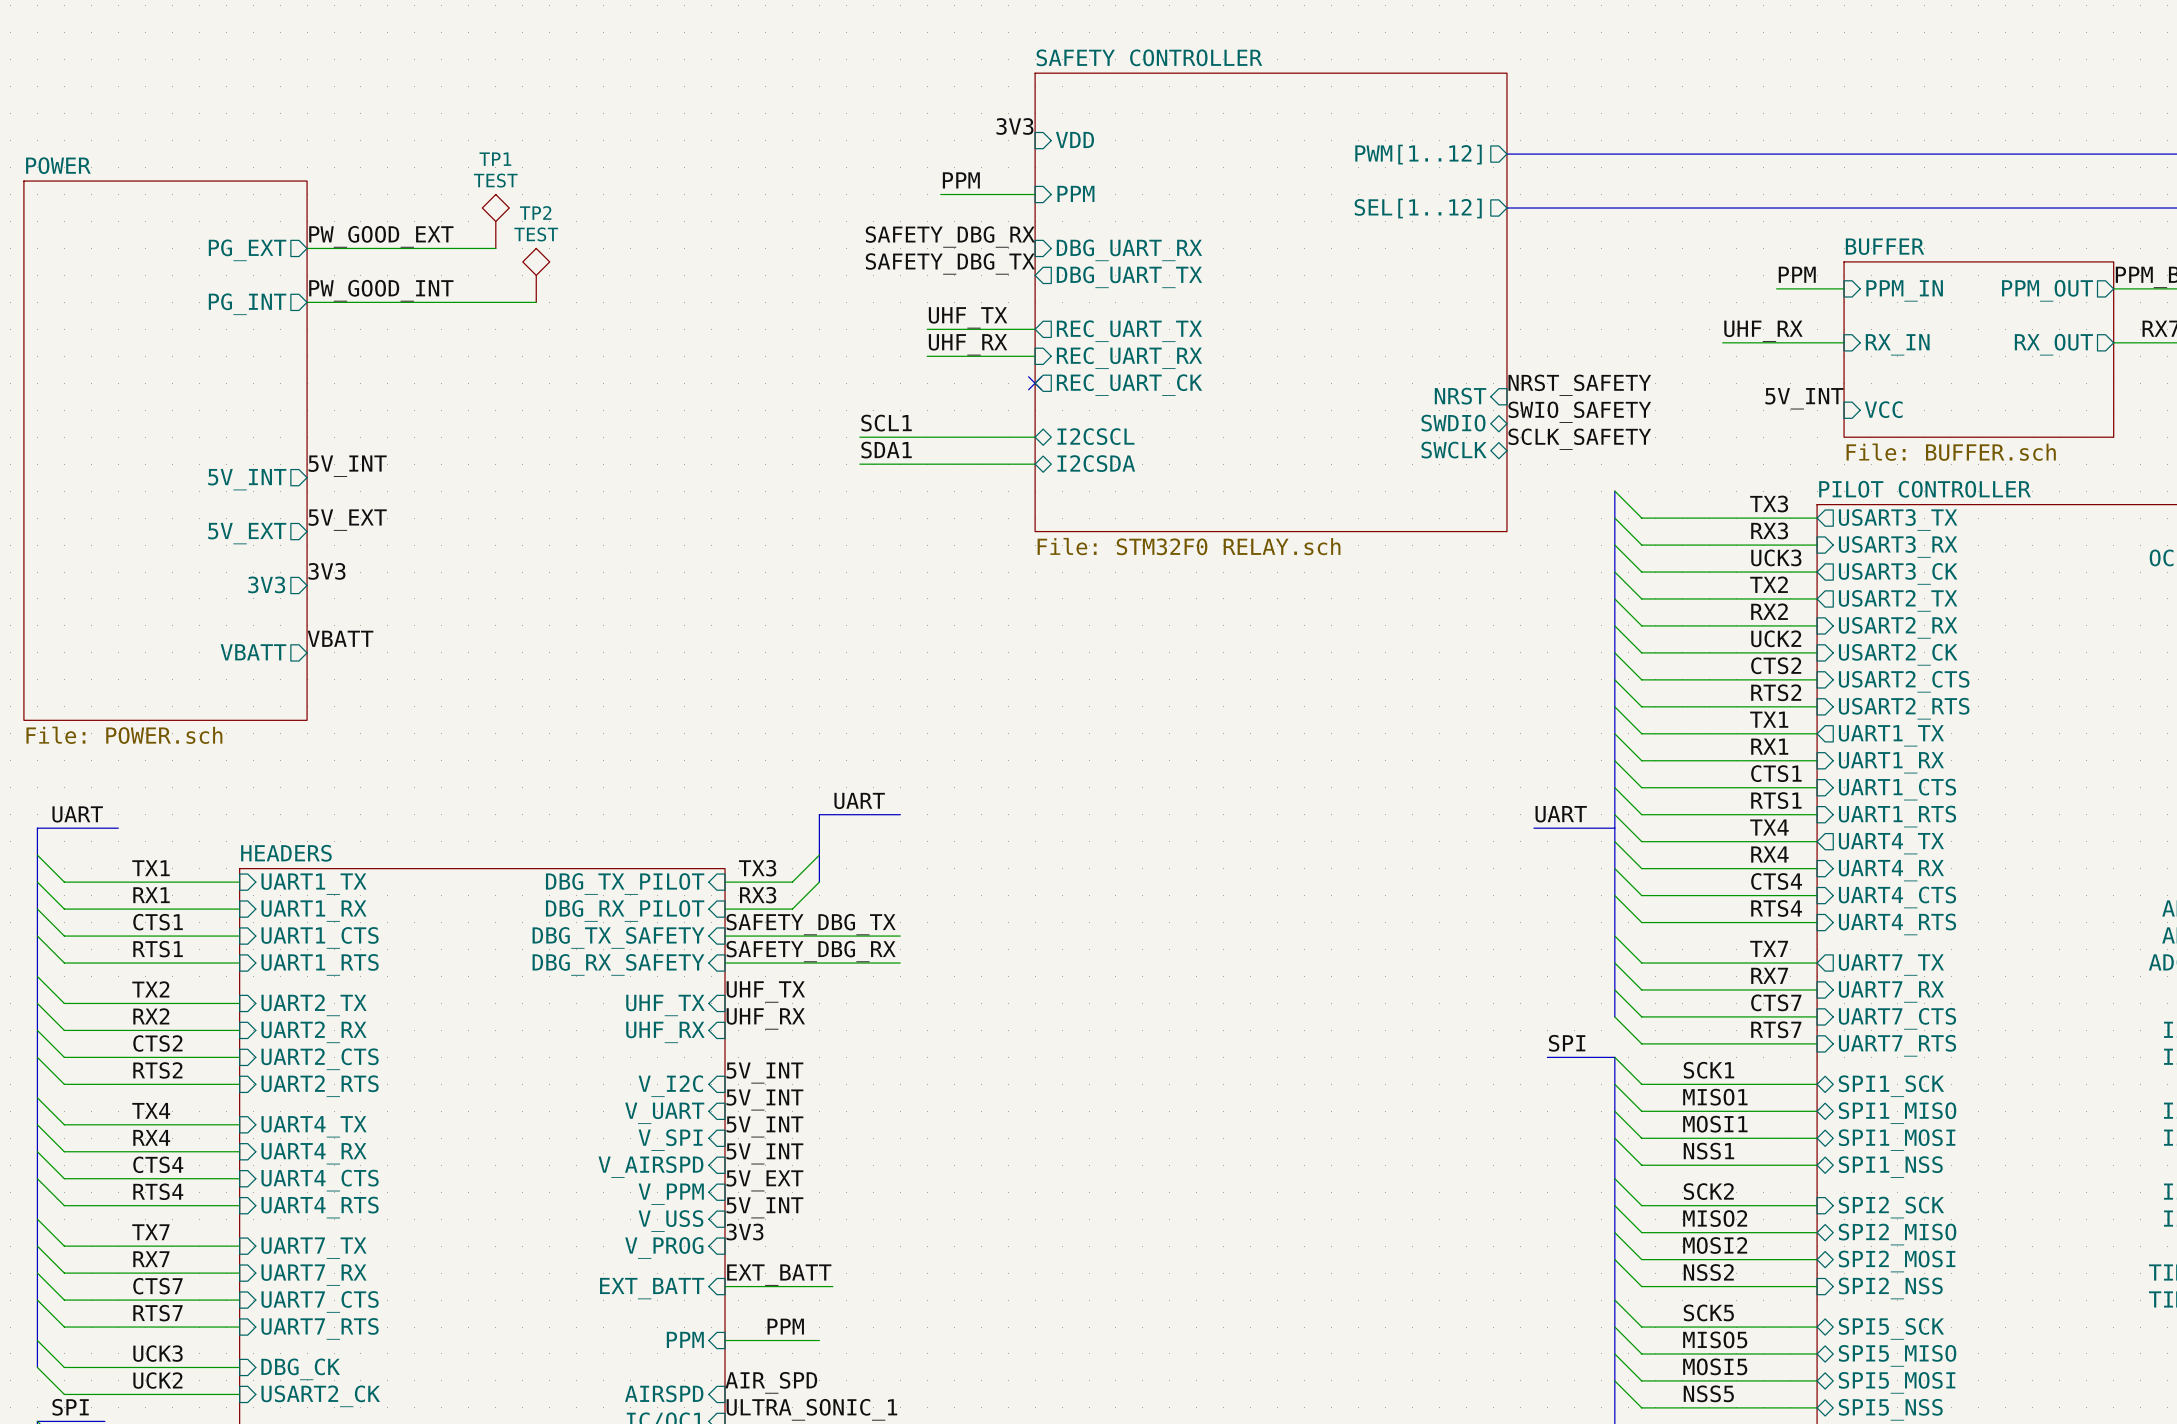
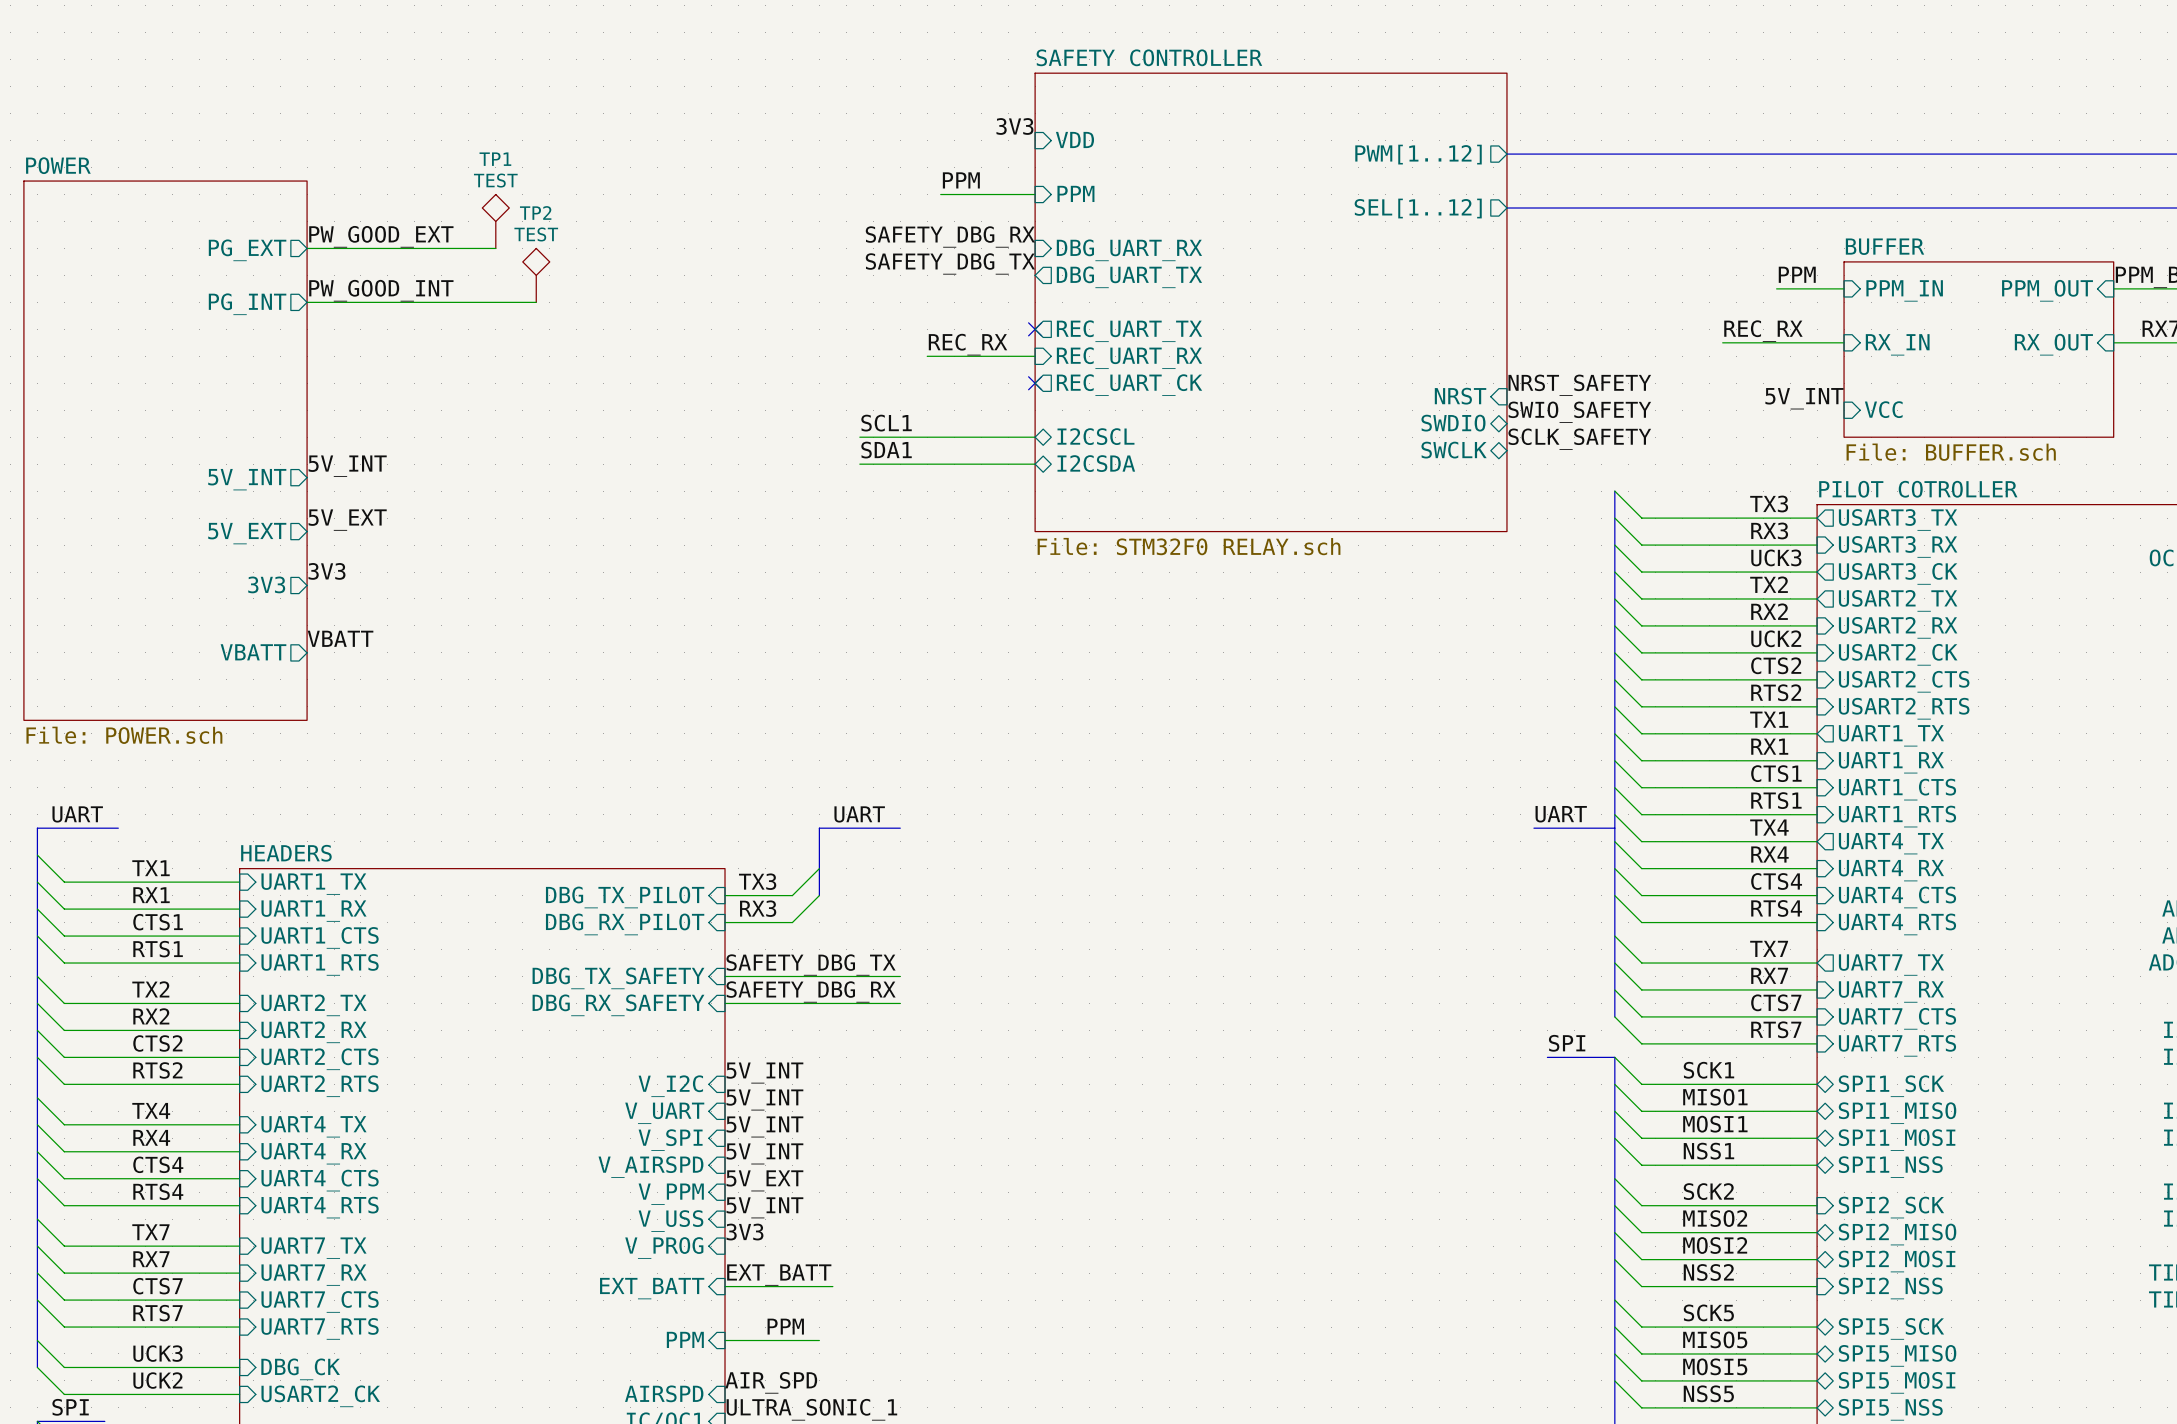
sheet pin shape: output (2047, 290) -> input (2047, 290)
label: UHF_TX (968, 317) -> none
wire: (927, 329) (1035, 329) -> none
no-connect mark: none -> (1035, 329)
label: UHF_RX (1763, 331) -> REC_RX (1763, 331)
label: UHF_RX (968, 344) -> REC_RX (967, 344)
sheet pin shape: output (2053, 344) -> input (2053, 344)
sheet PILOT CONTROLLER name: PILOT CONTROLLER (1925, 489) -> PILOT COTROLLER (1918, 489)
label position: UART (859, 800) -> UART (859, 814)
bus: (900, 814) (819, 814) (819, 828) -> (900, 828) (819, 828)
wire: (819, 855) (792, 882) (725, 882) -> (819, 868) (792, 895) (725, 895)
label position: TX3 (757, 868) -> TX3 (757, 881)
wire: (819, 882) (792, 909) (725, 909) -> (819, 895) (792, 922) (725, 922)
bus: none -> (819, 882) (819, 895)
sheet pin position: DBG_TX_PILOT (625, 883) -> DBG_TX_PILOT (625, 897)
label position: RX3 (758, 895) -> RX3 (758, 908)
sheet pin position: DBG_RX_PILOT (625, 910) -> DBG_RX_PILOT (625, 924)
label position: SAFETY_DBG_TX (811, 924) -> SAFETY_DBG_TX (811, 965)
wire: (725, 936) (900, 936) -> (725, 1003) (900, 1003)
sheet pin position: DBG_TX_SAFETY (618, 937) -> DBG_TX_SAFETY (618, 978)
label: SAFETY_DBG_RX (811, 951) -> none
wire: (725, 963) (900, 963) -> (725, 976) (900, 976)
sheet pin: DBG_RX_SAFETY (618, 964) -> none
label: UHF_TX (765, 991) -> SAFETY_DBG_RX (811, 991)
sheet pin: UHF_TX (665, 1005) -> DBG_RX_SAFETY (618, 1005)
label: UHF_RX (765, 1018) -> none
sheet pin: UHF_RX (665, 1032) -> none

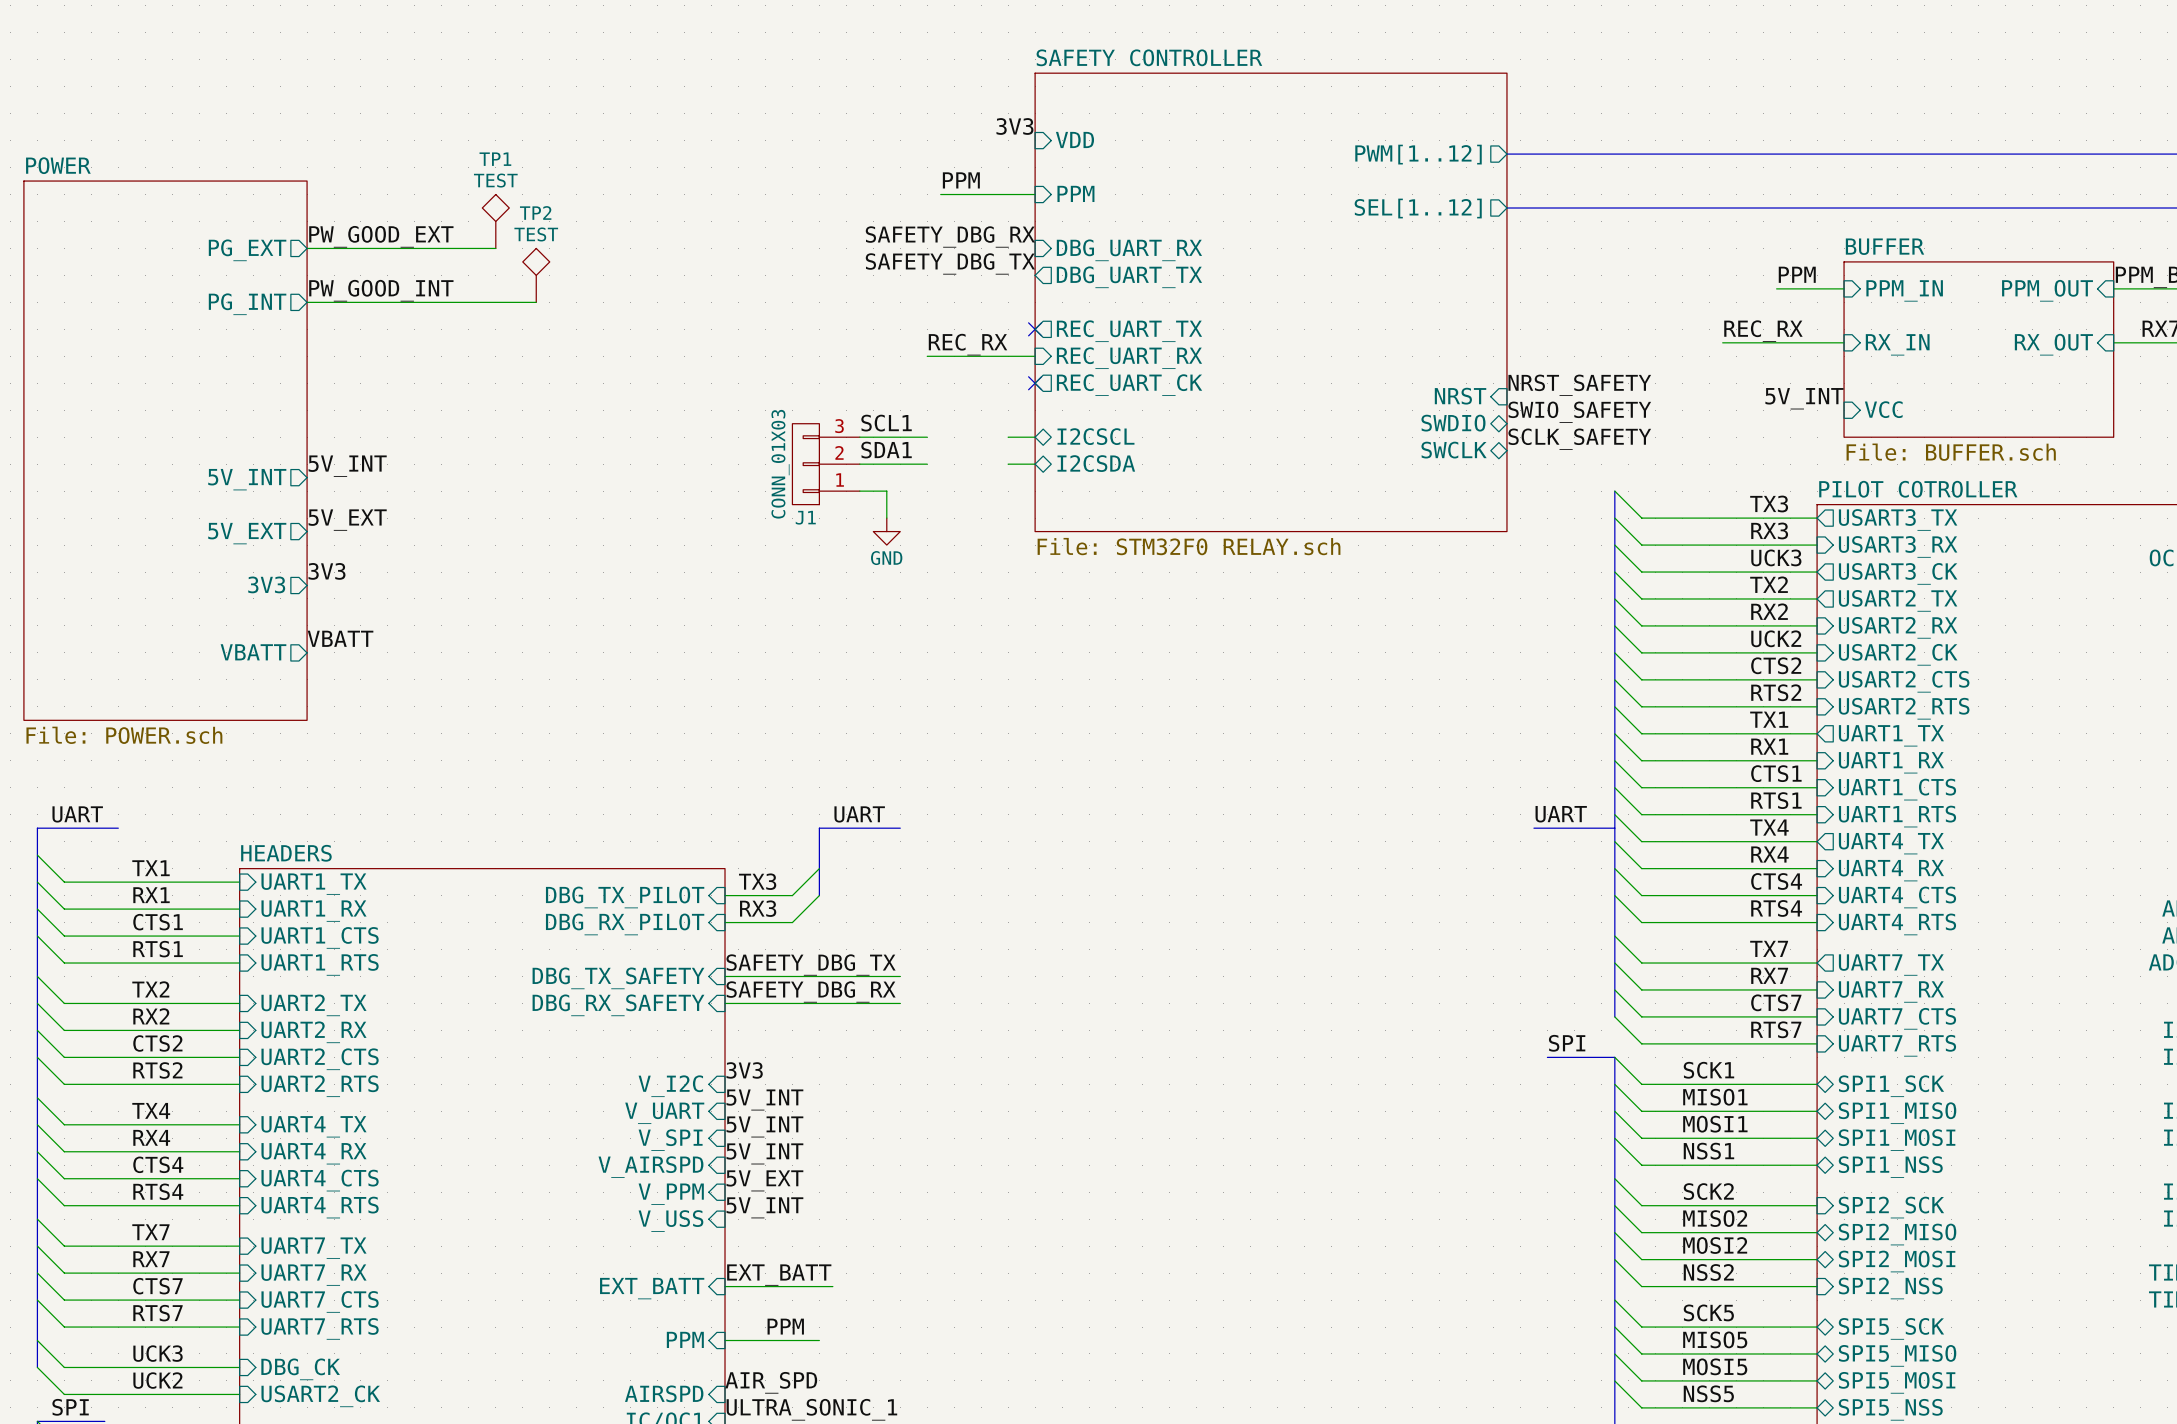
wire: (927, 437) (1008, 437) -> none
J1: none -> CONN_01X03 (826, 464)
wire: (927, 464) (1008, 464) -> none
wire: none -> (859, 491) (886, 491) (886, 518)
power symbol: none -> GND (886, 531)
label: 5V_INT (764, 1073) -> 3V3 (744, 1070)
label: 3V3 (744, 1232) -> none
sheet pin: V_PROG (664, 1248) -> none

